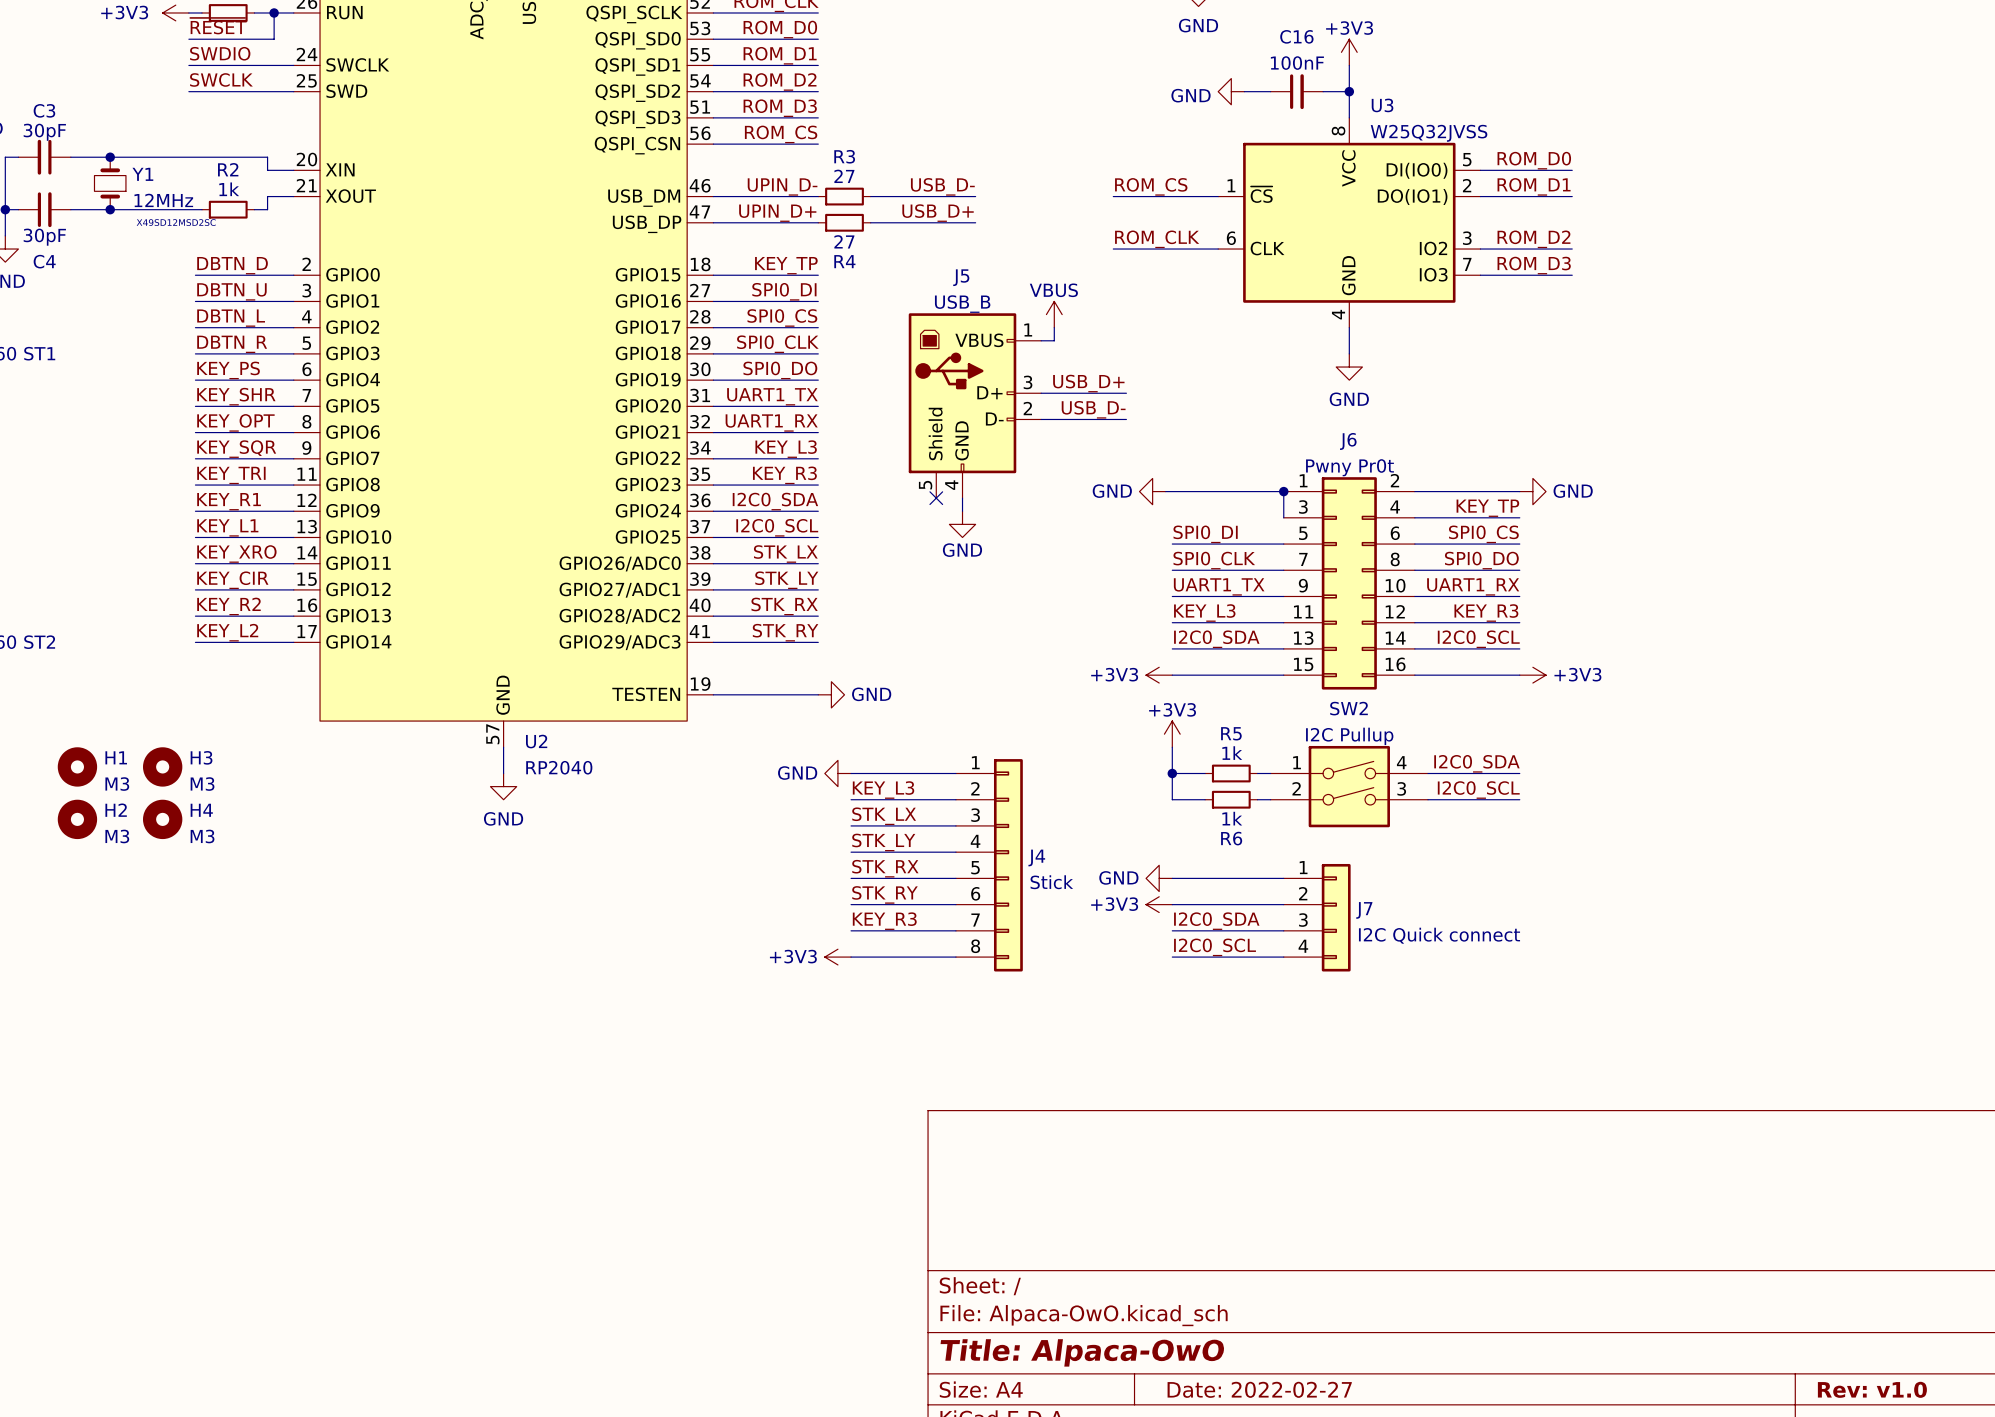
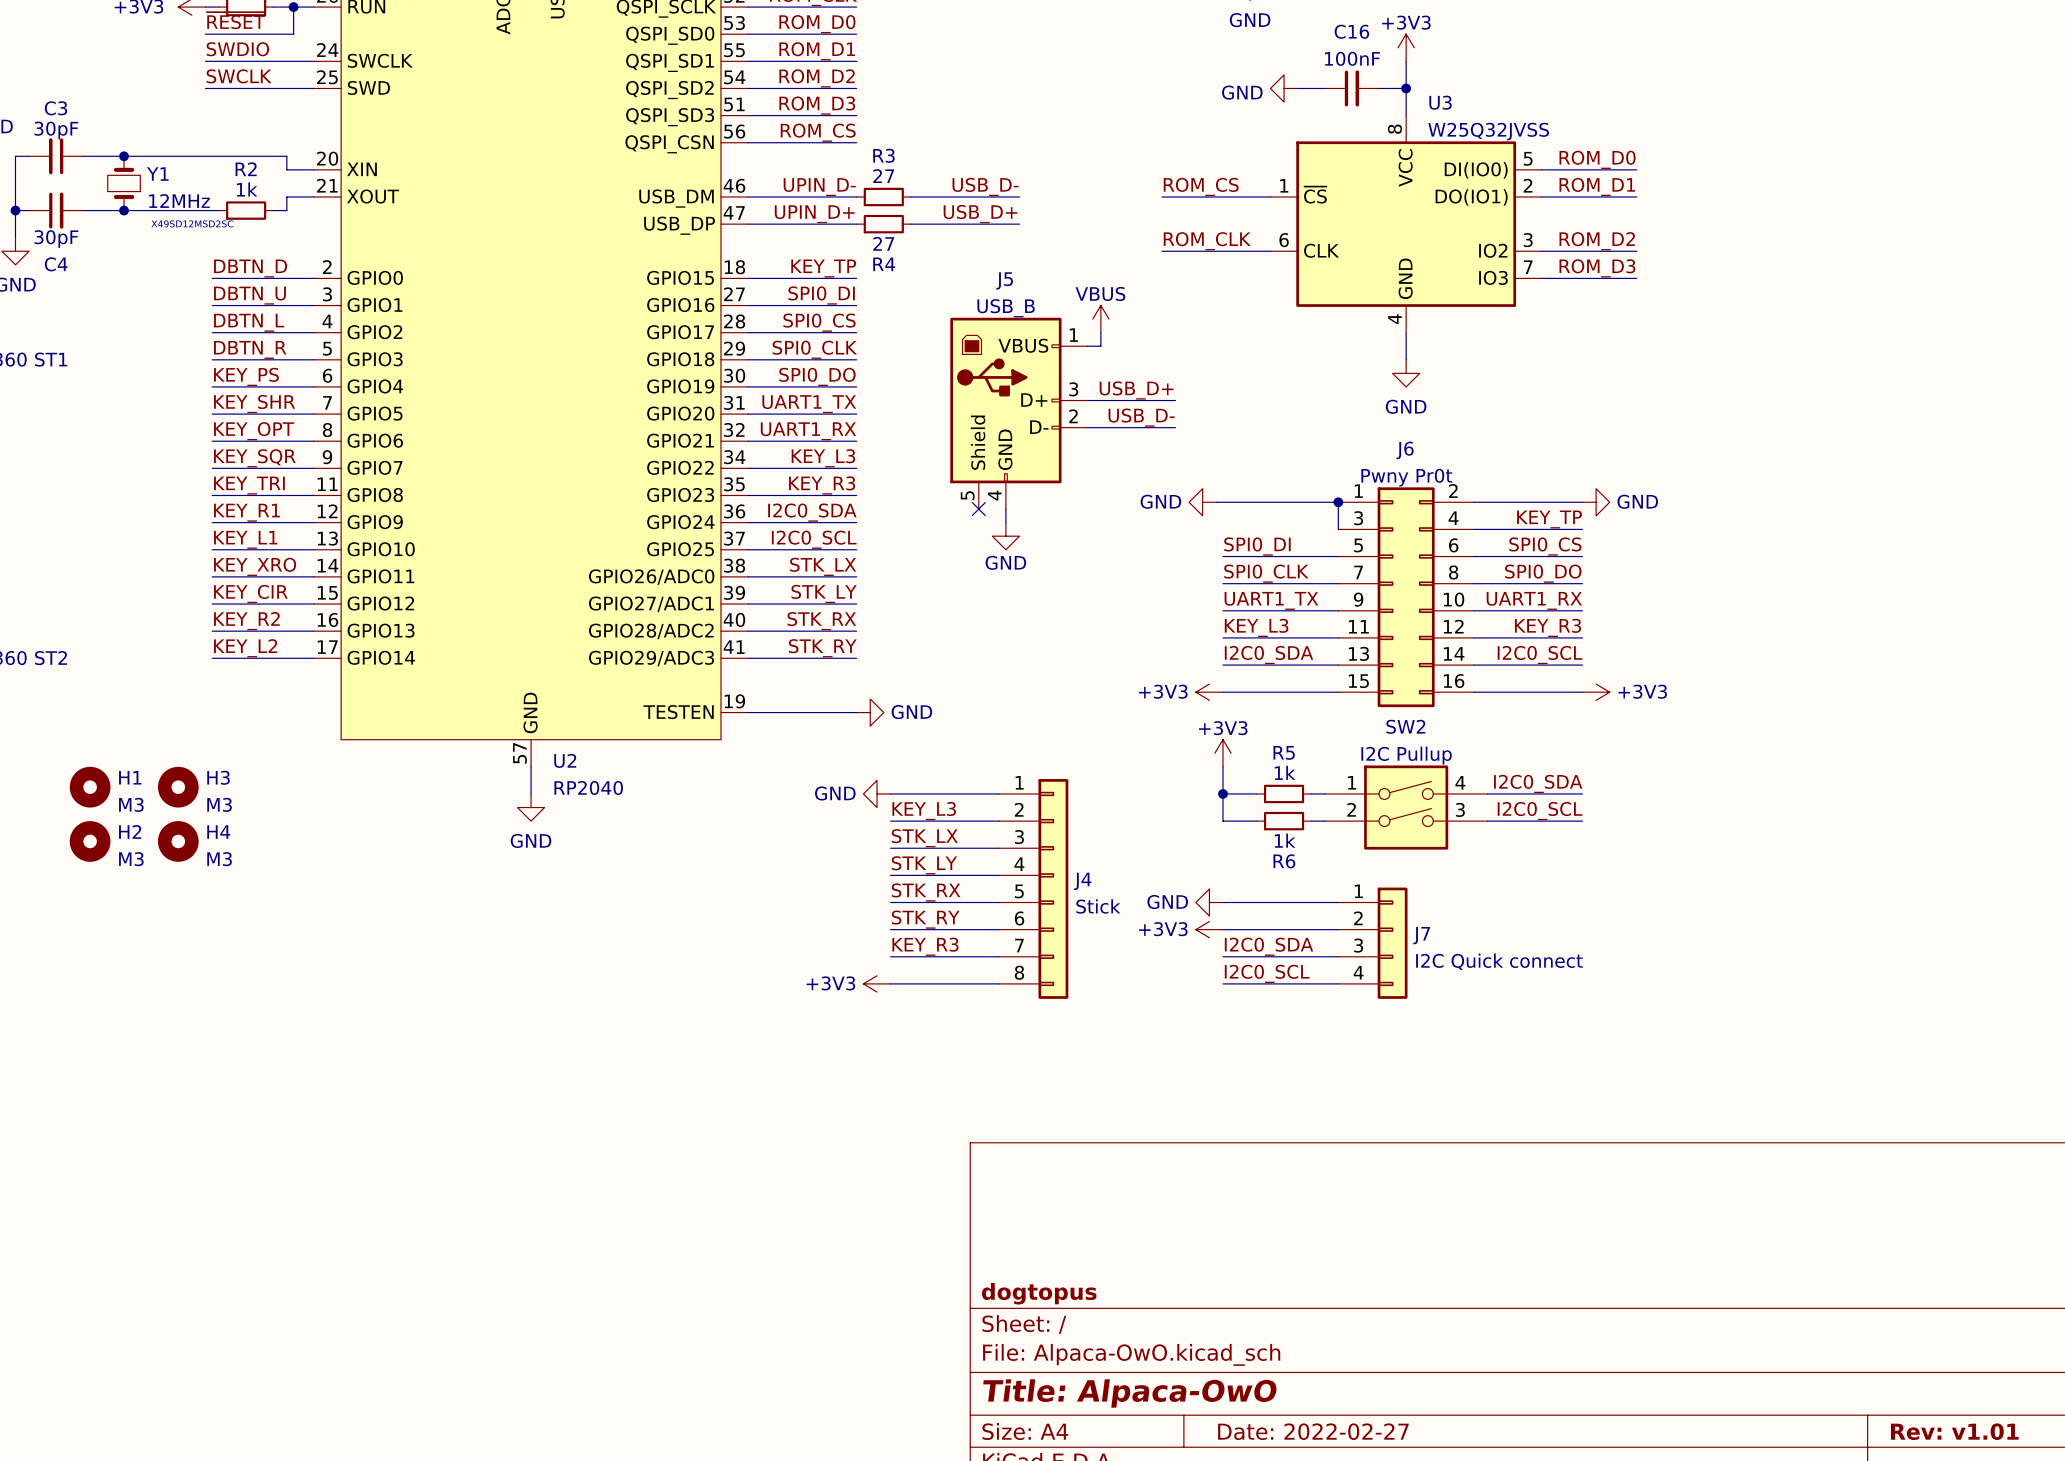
title block: none -> dogtopus (1039, 1293)
title block: Rev: v1.0 (1872, 1389) -> Rev: v1.01 (1954, 1431)

